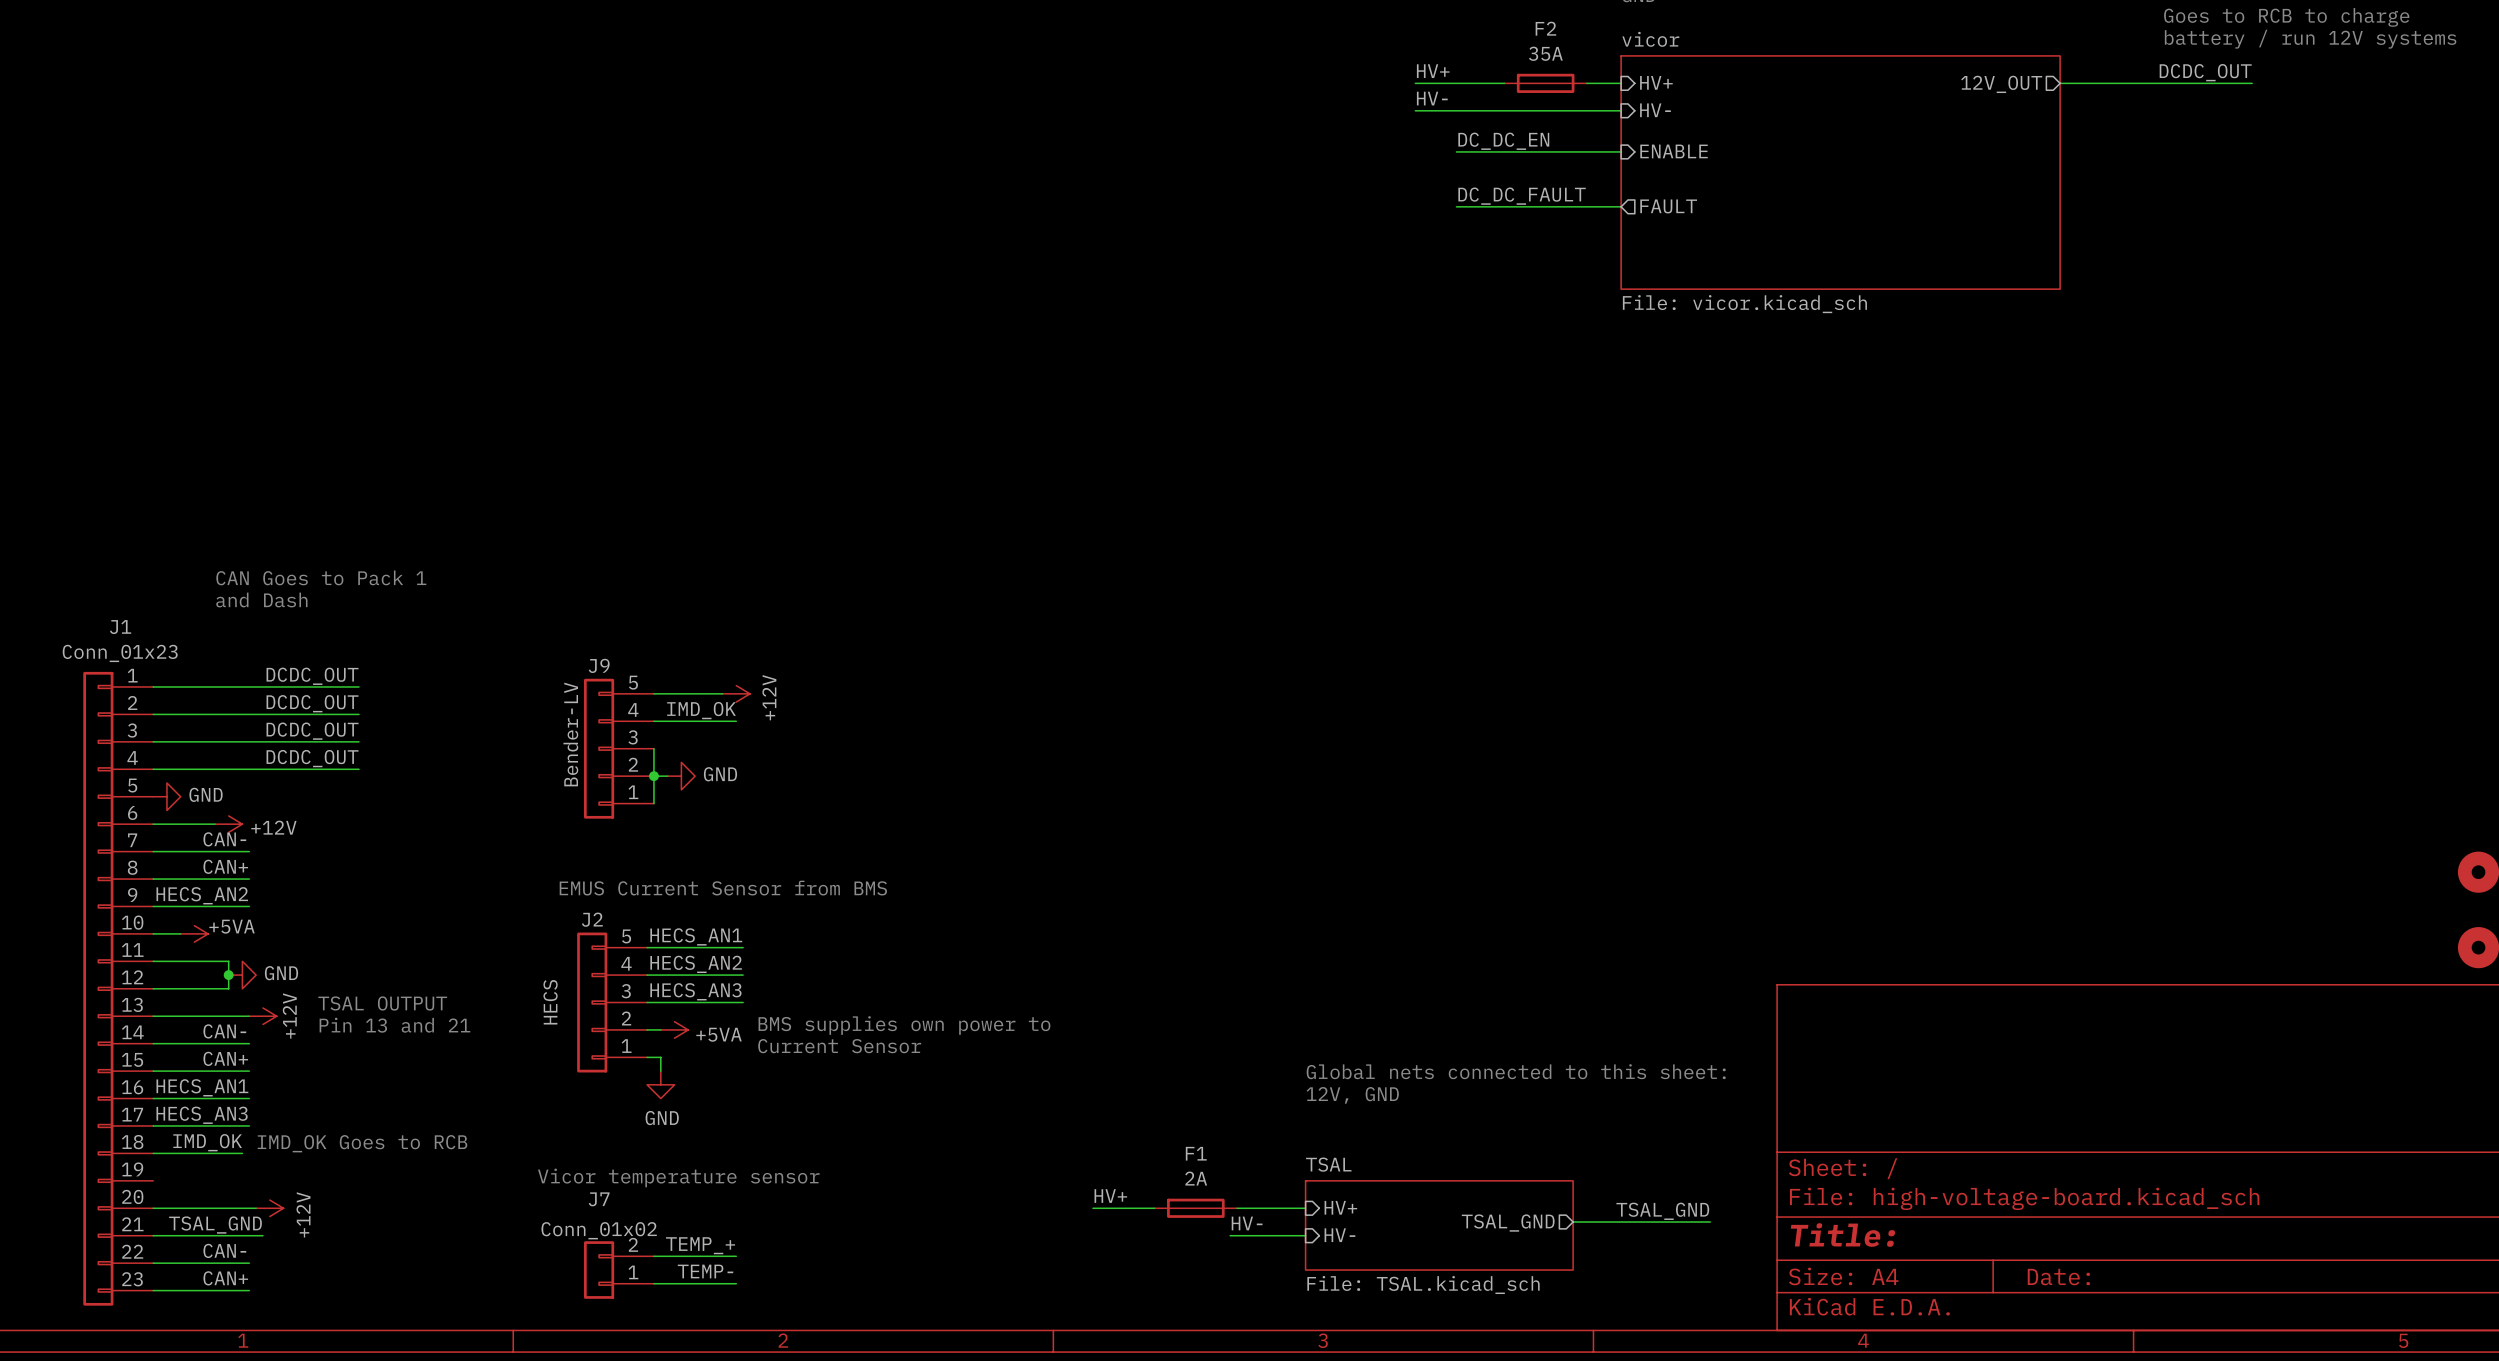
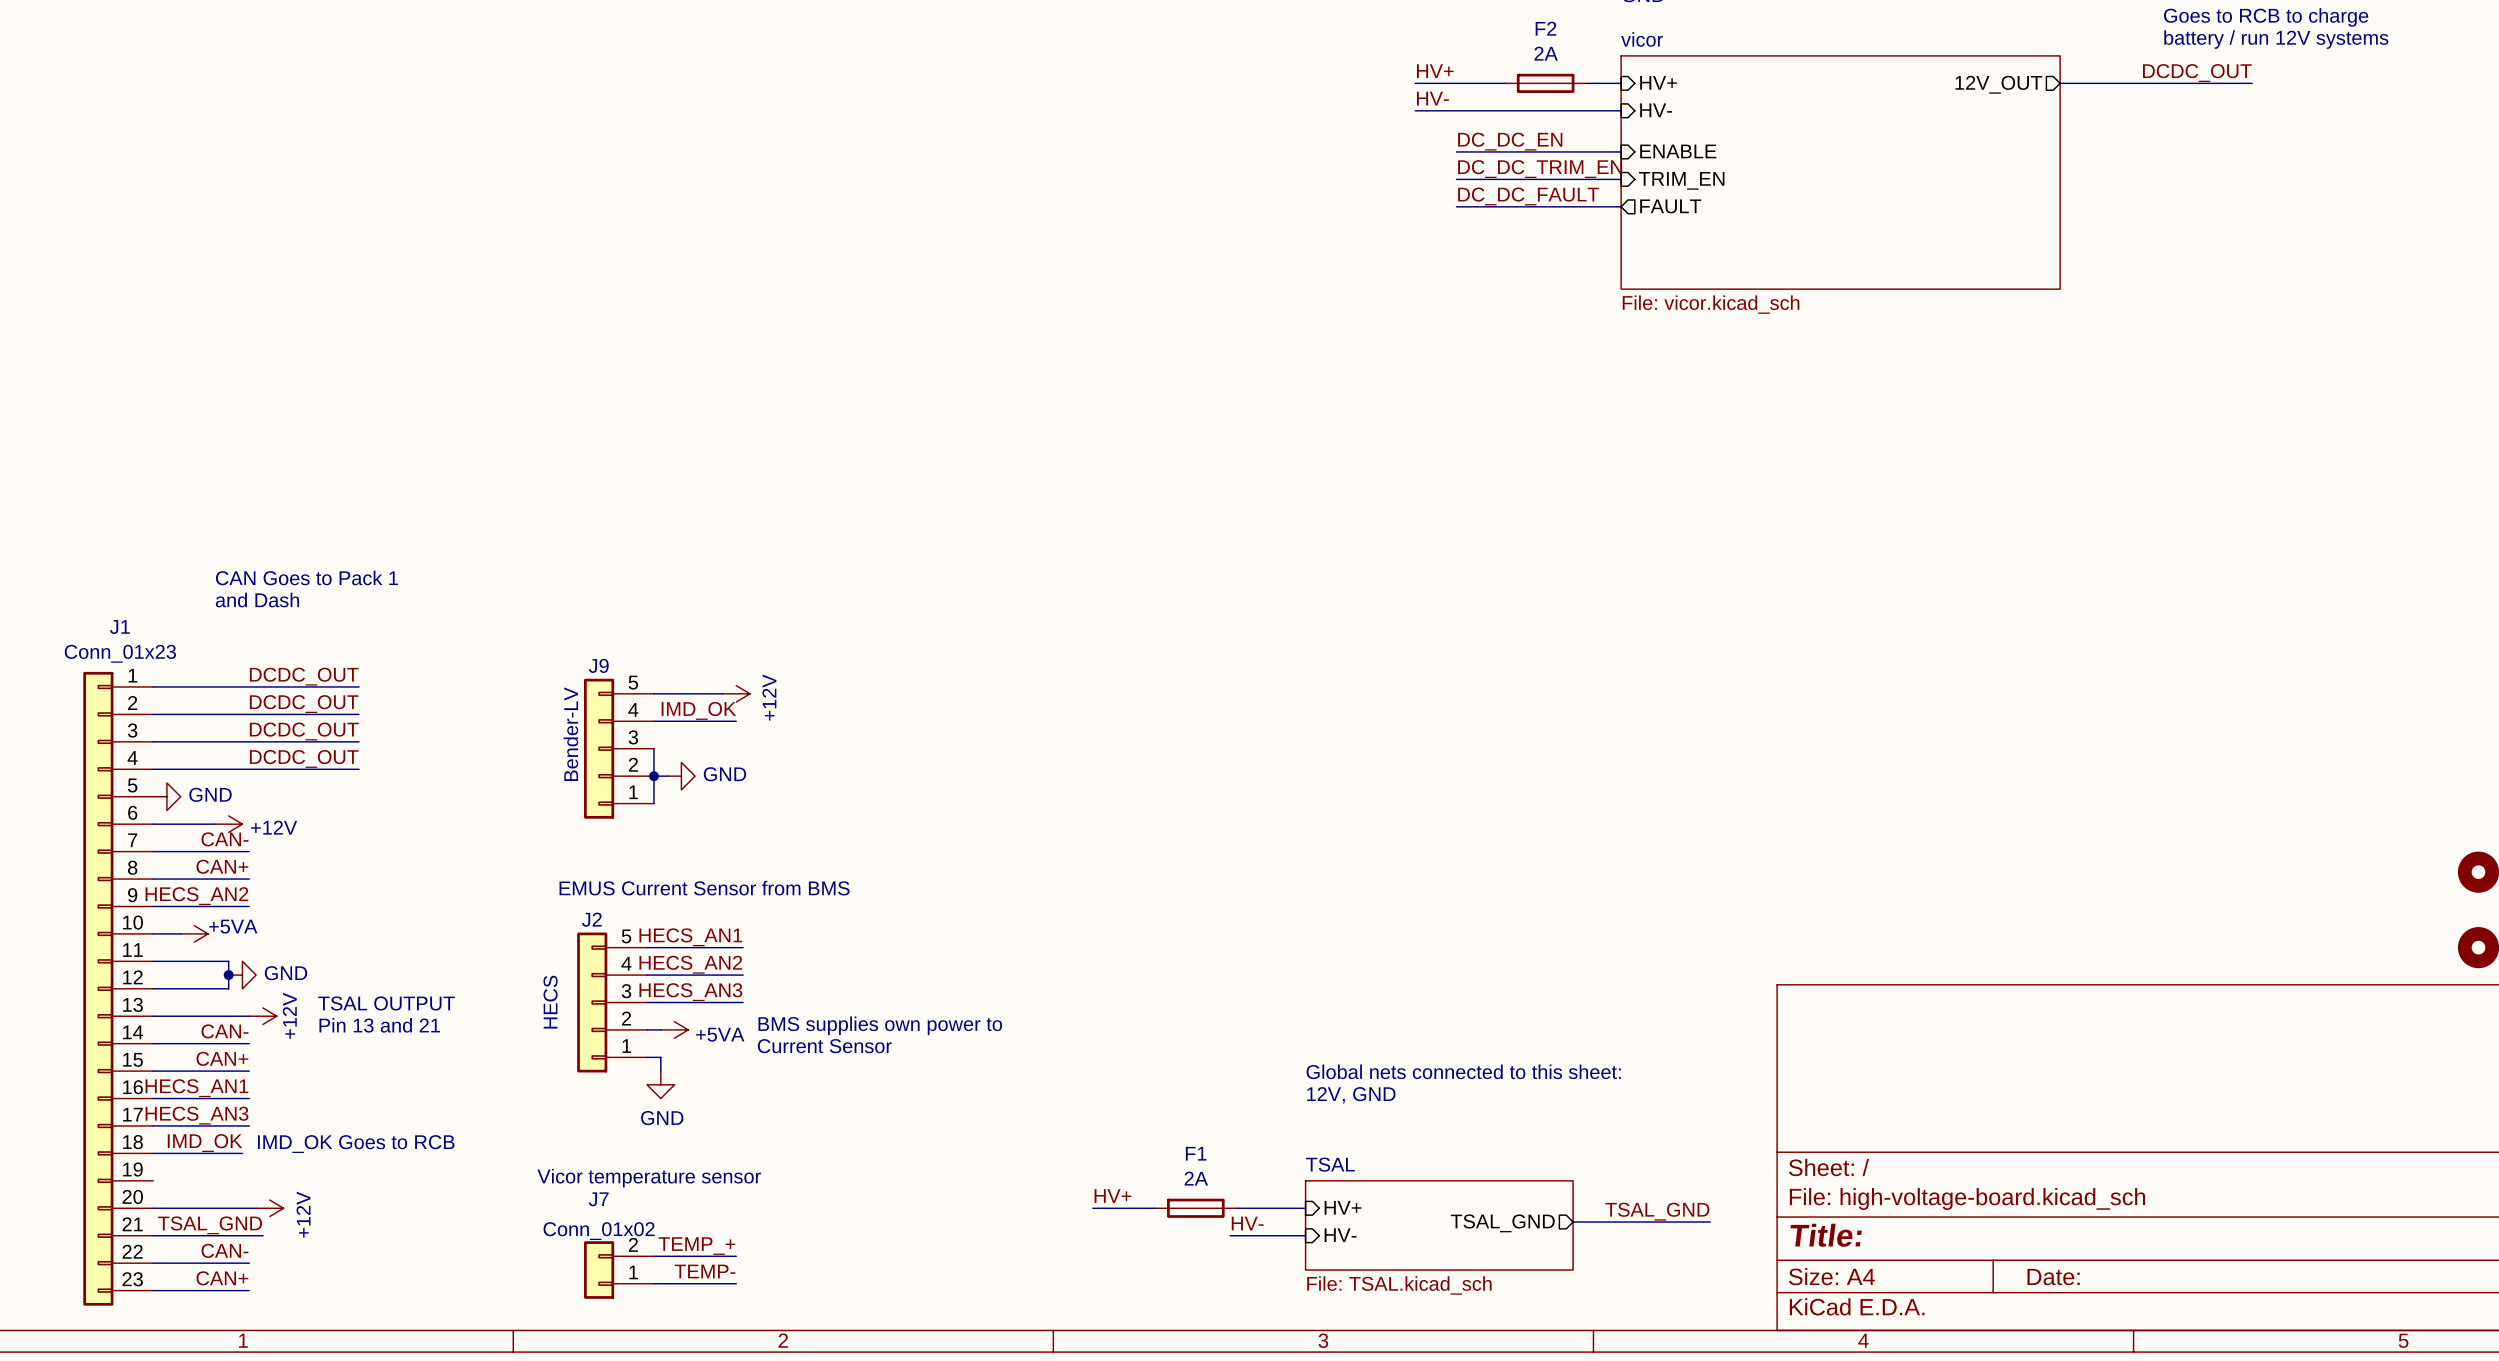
F2 value: 35A (1545, 53) -> 2A (1546, 53)
label: none -> DC_DC_TRIM_EN (1540, 169)
wire: none -> (1456, 179) (1621, 179)
sheet pin: none -> TRIM_EN (1681, 180)

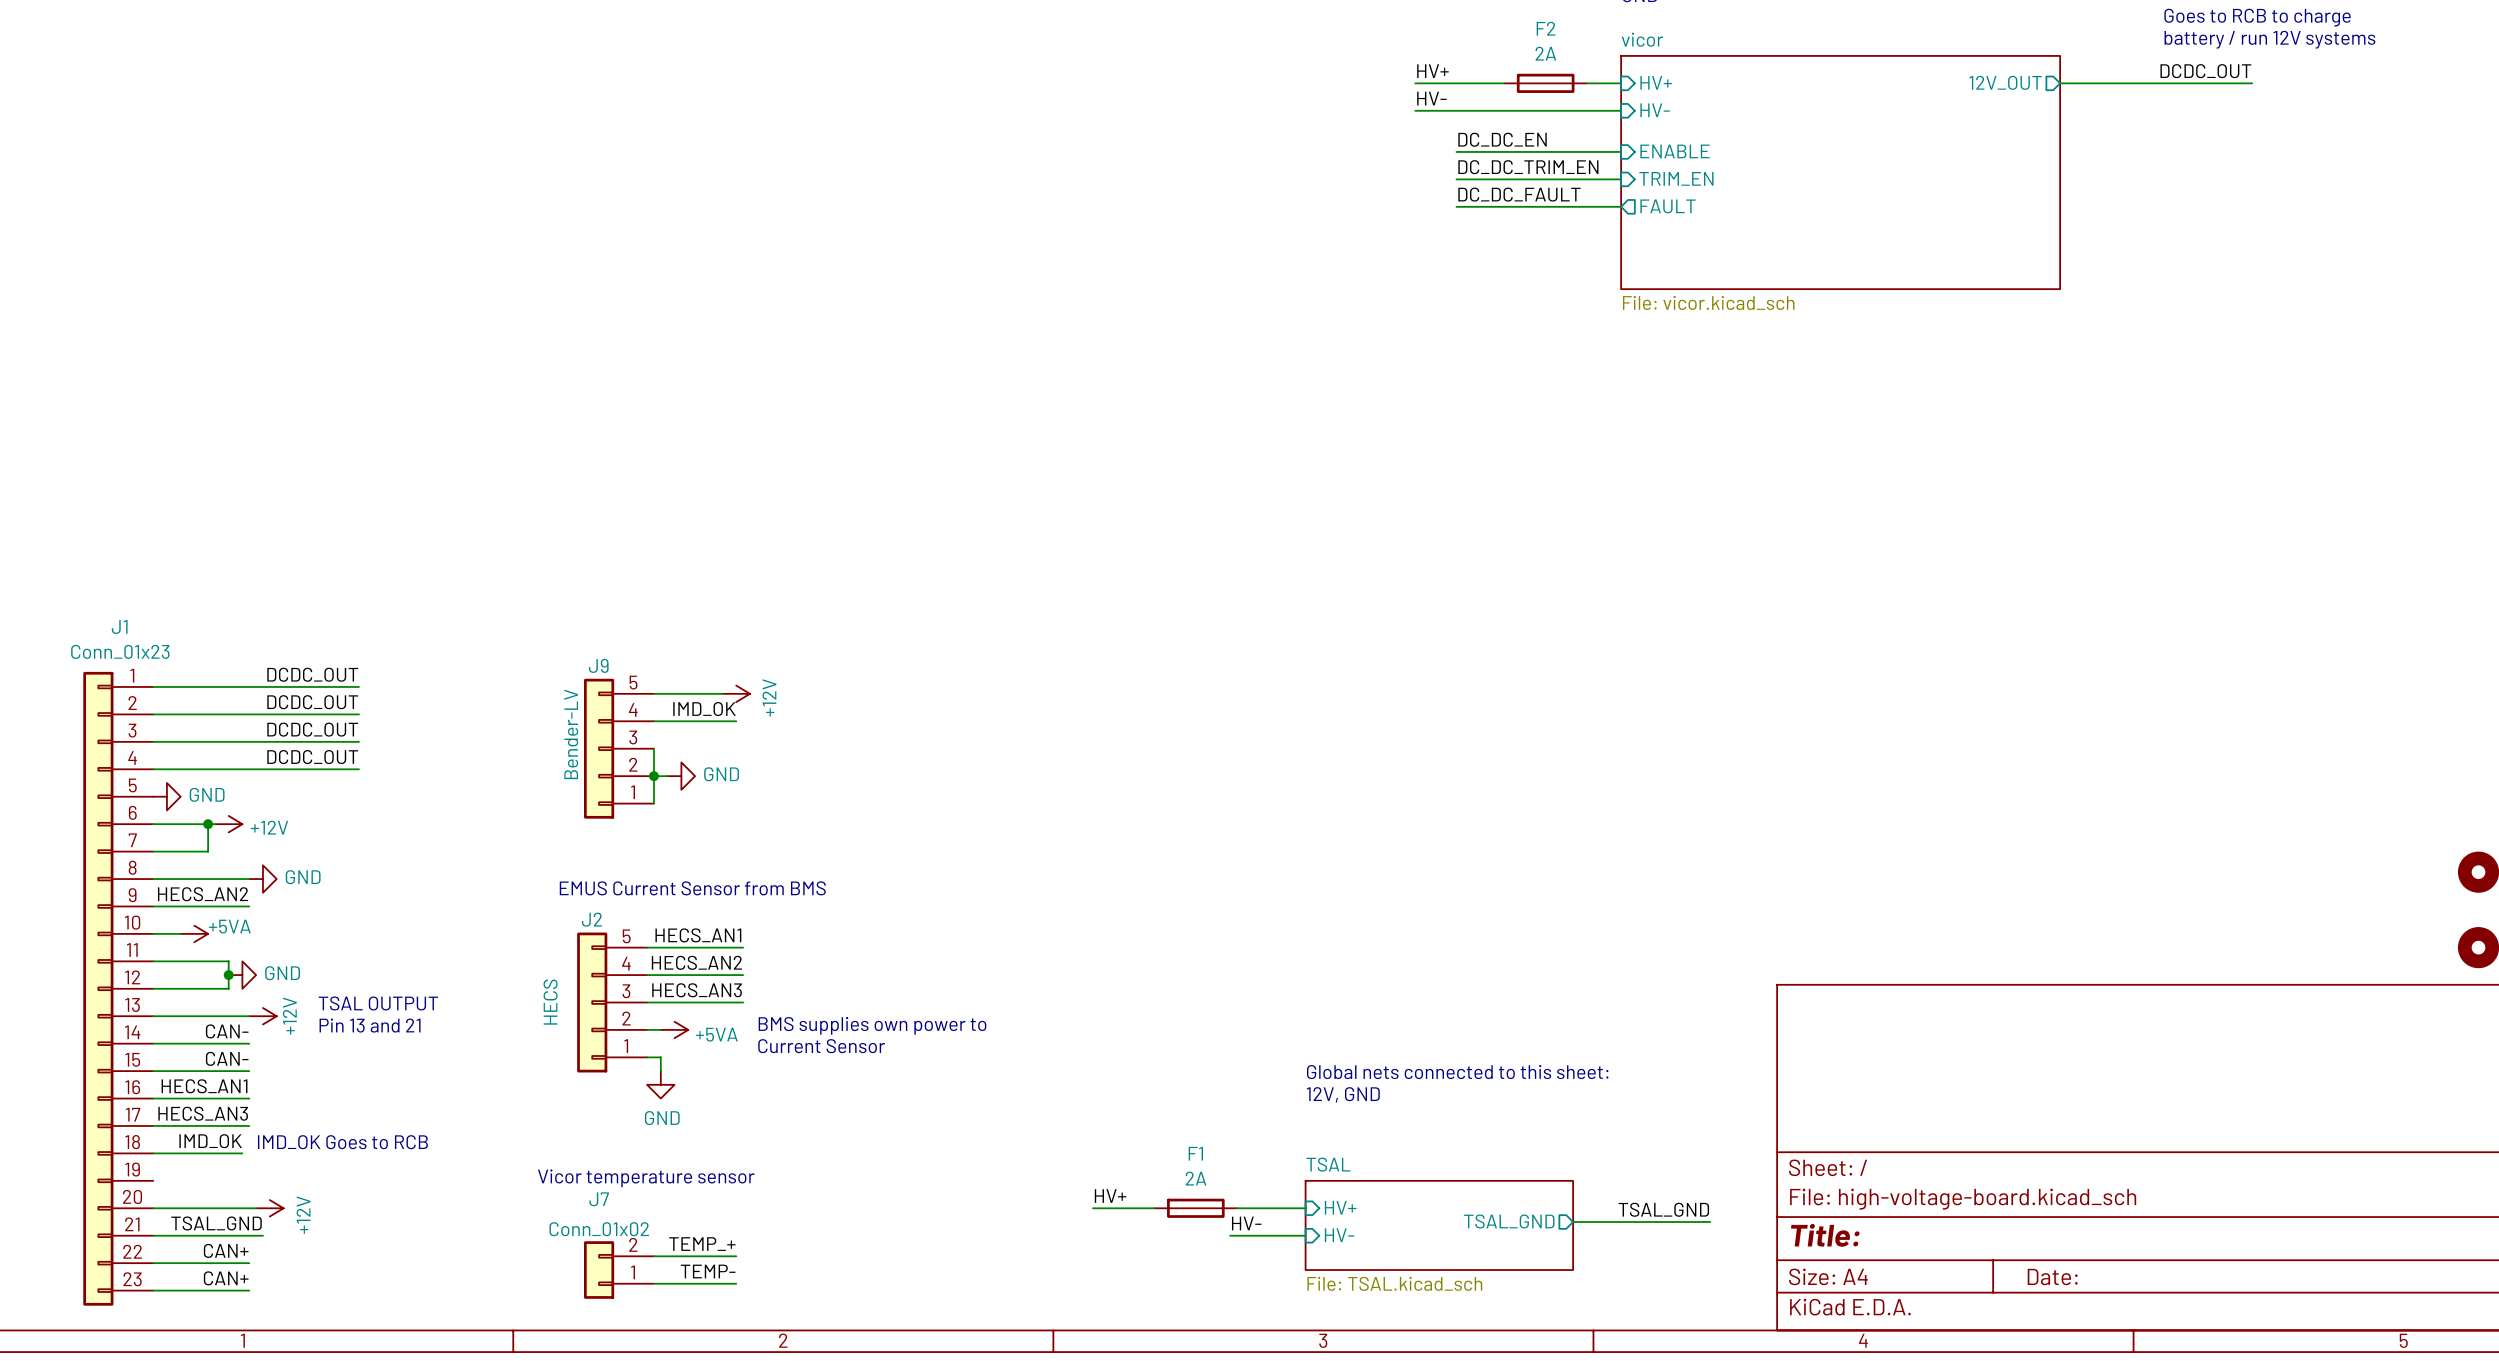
text: CAN Goes to Pack 1 (306, 577) -> none
text: and Dash (257, 600) -> none
junction: none -> (208, 824)
label: CAN- (224, 839) -> none
wire: (208, 851) (249, 851) -> (208, 851) (208, 824)
label: CAN+ (222, 866) -> none
power symbol: none -> GND (262, 879)
label: CAN+ (222, 1058) -> CAN- (227, 1058)
label: CAN- (224, 1250) -> CAN+ (226, 1250)

